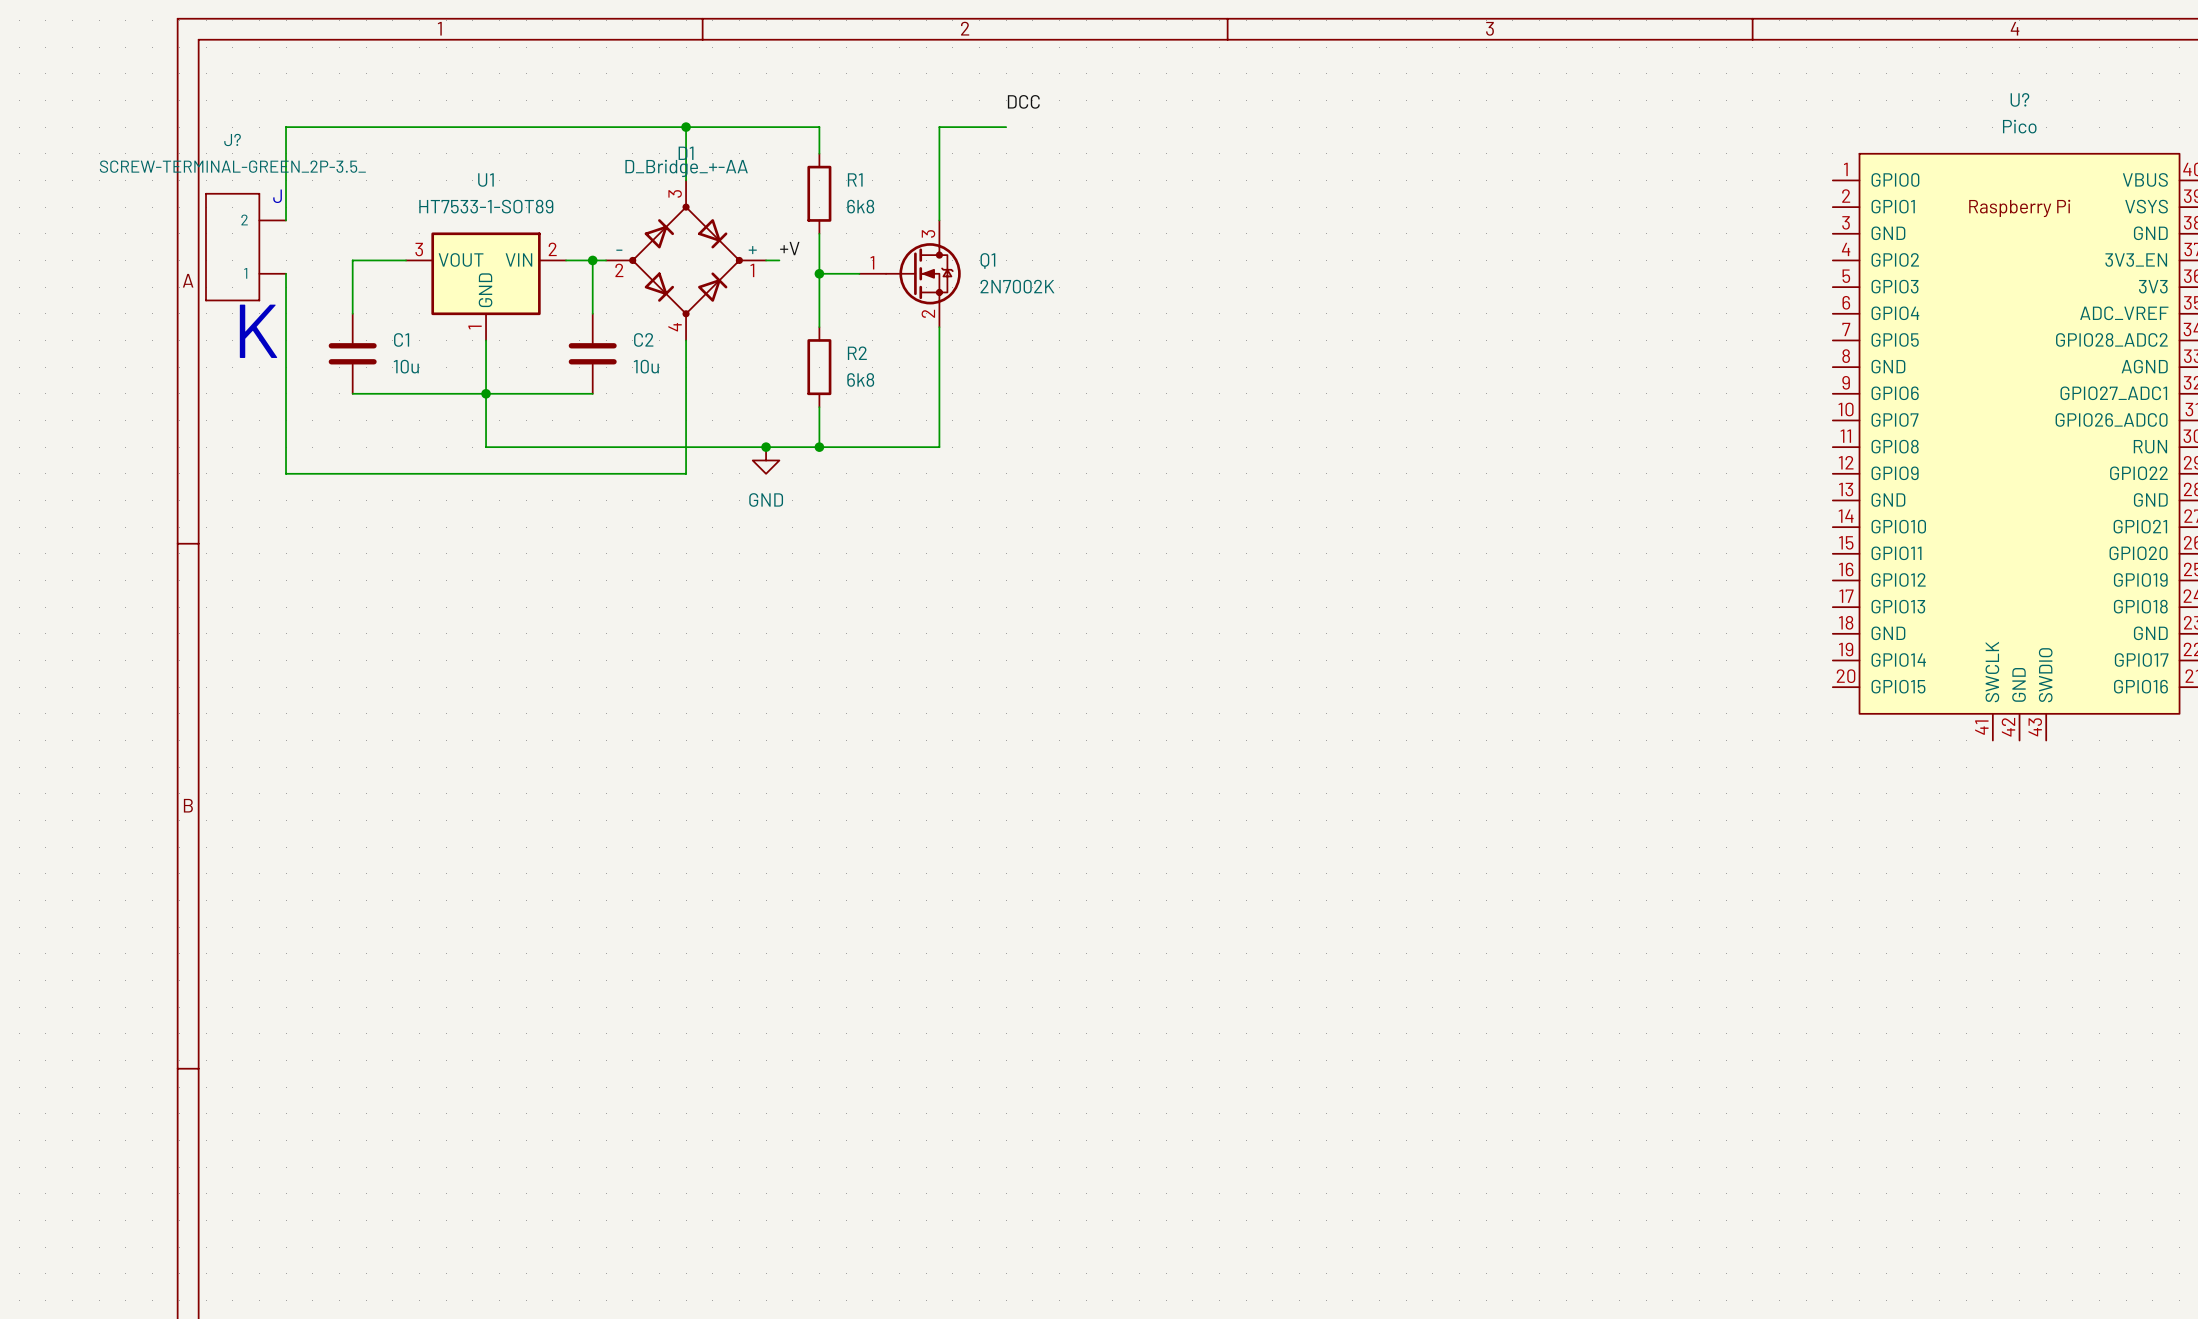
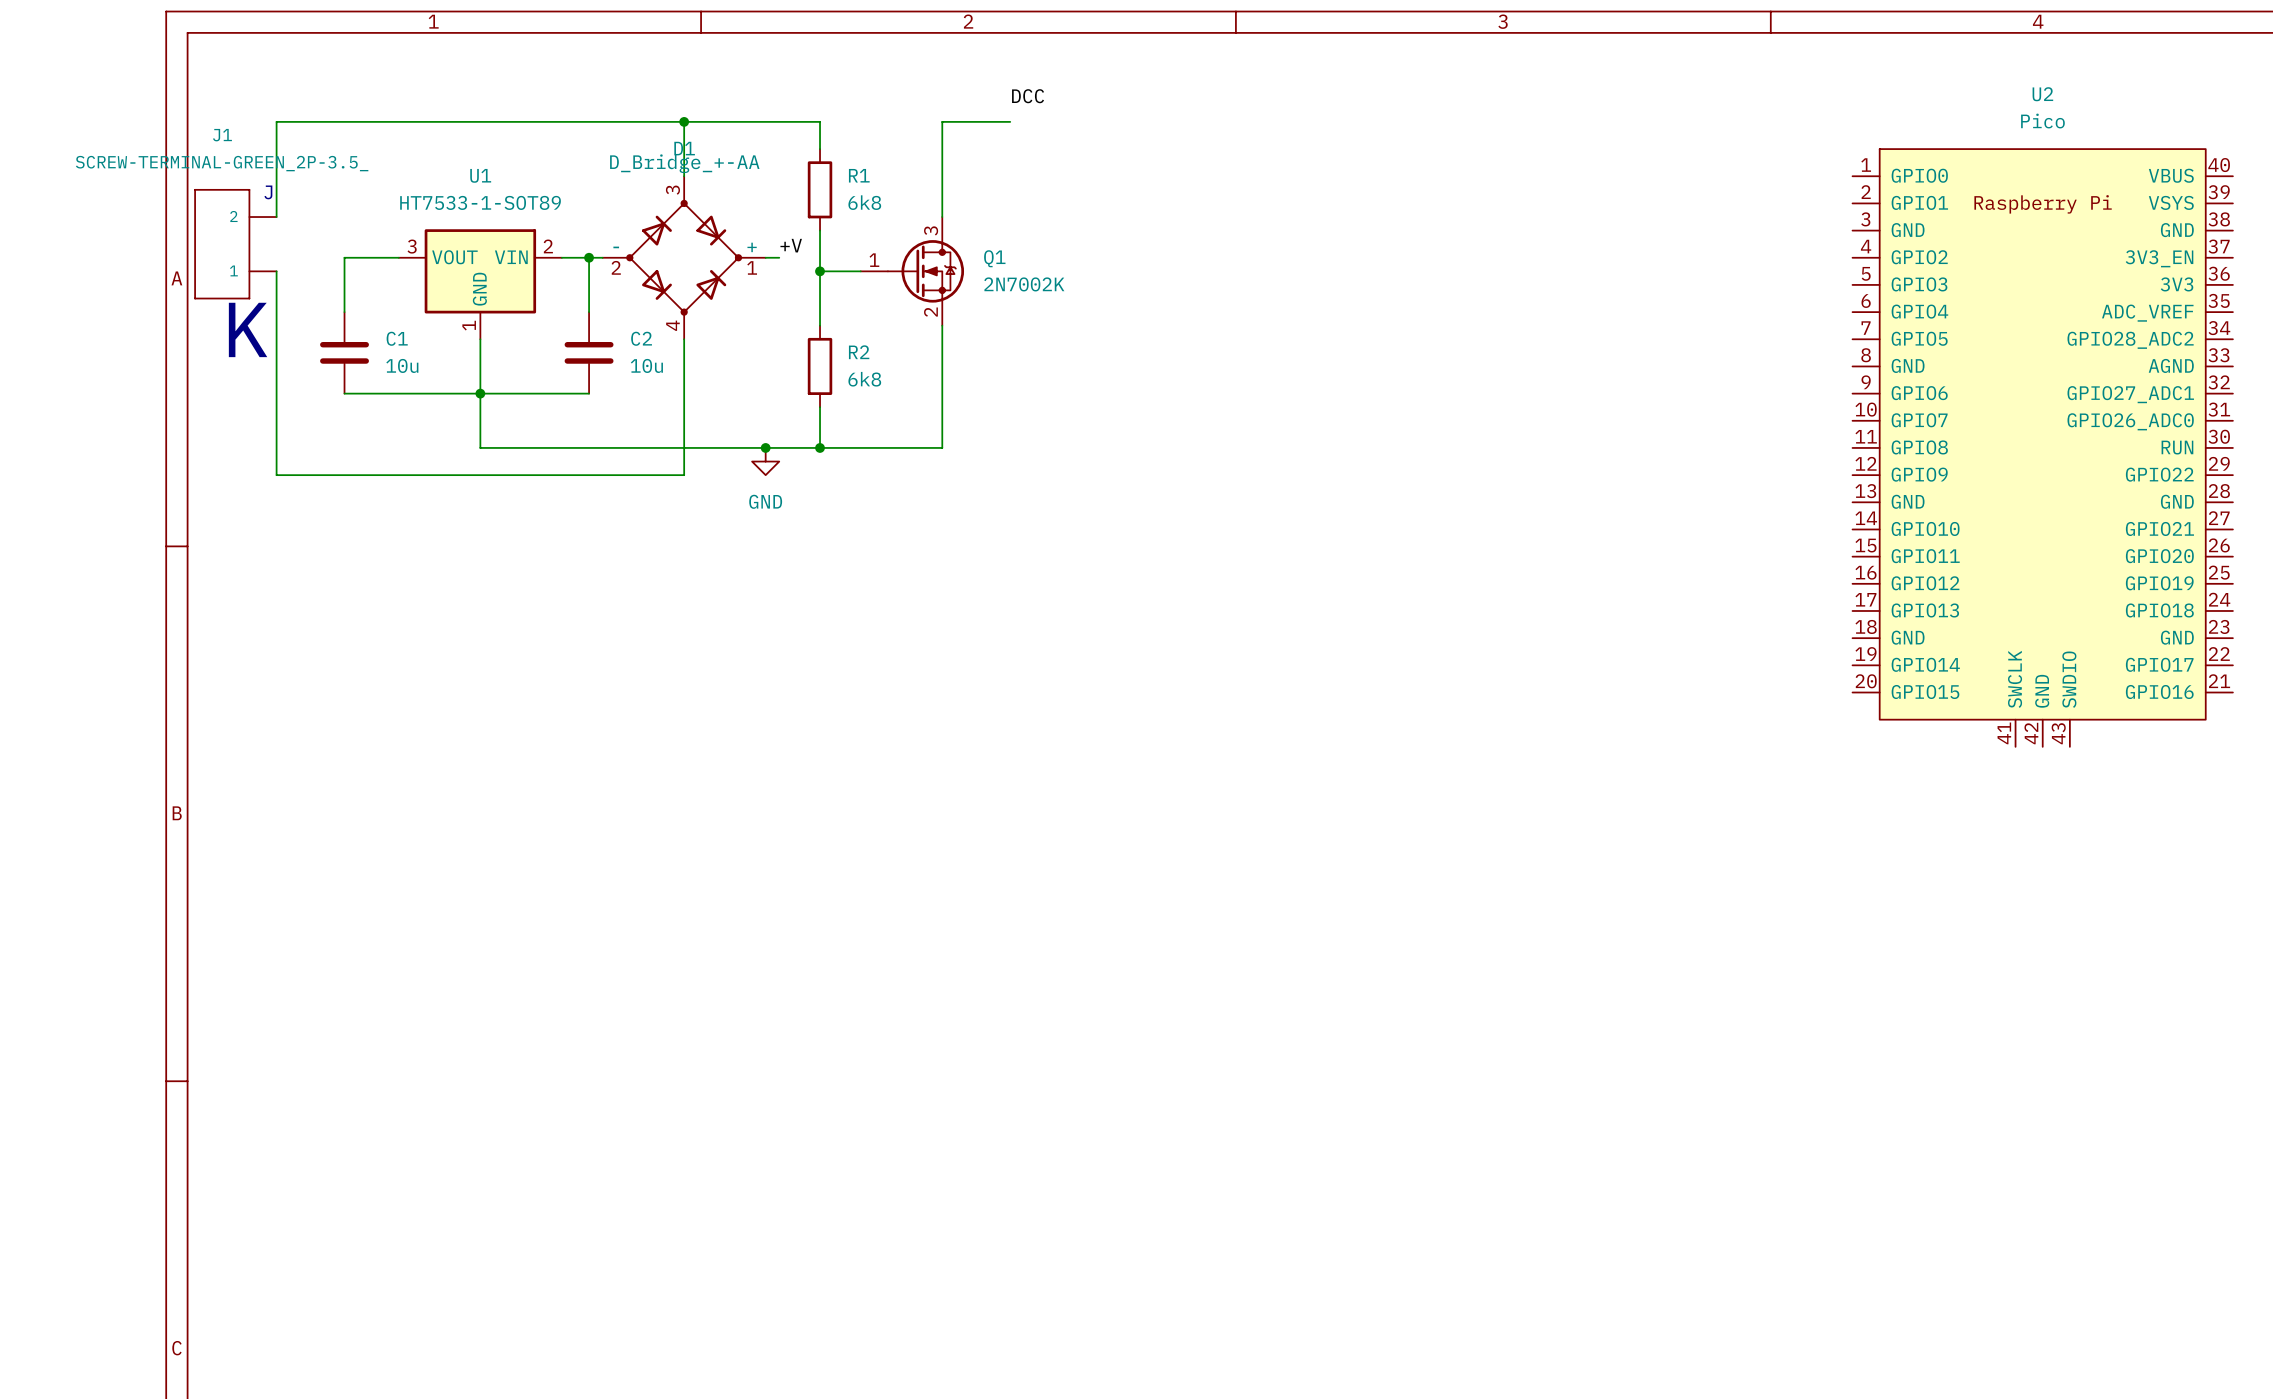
U? name: U? (2019, 99) -> U2 (2042, 94)
J? name: J? (232, 139) -> J1 (222, 135)

